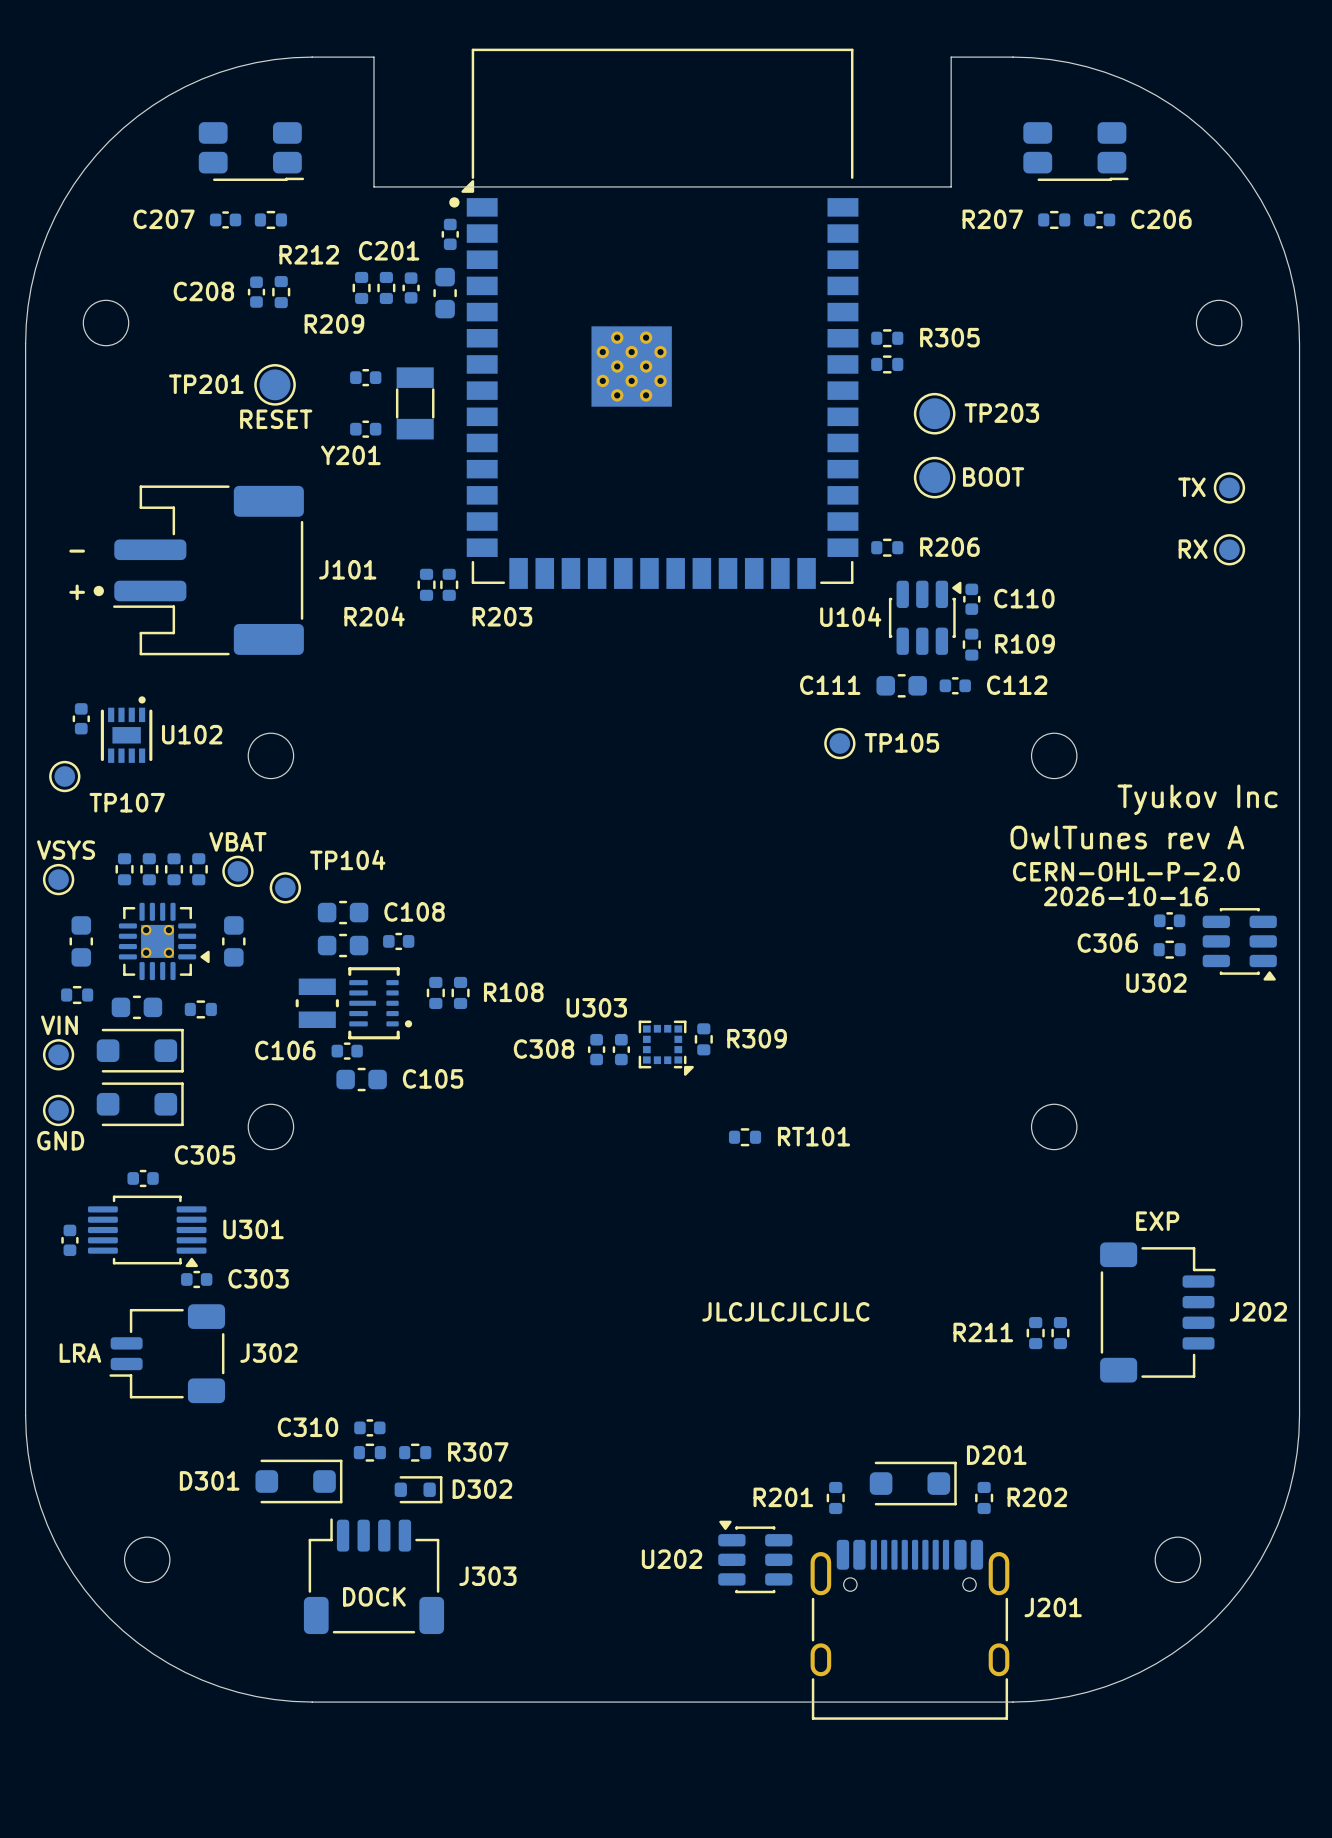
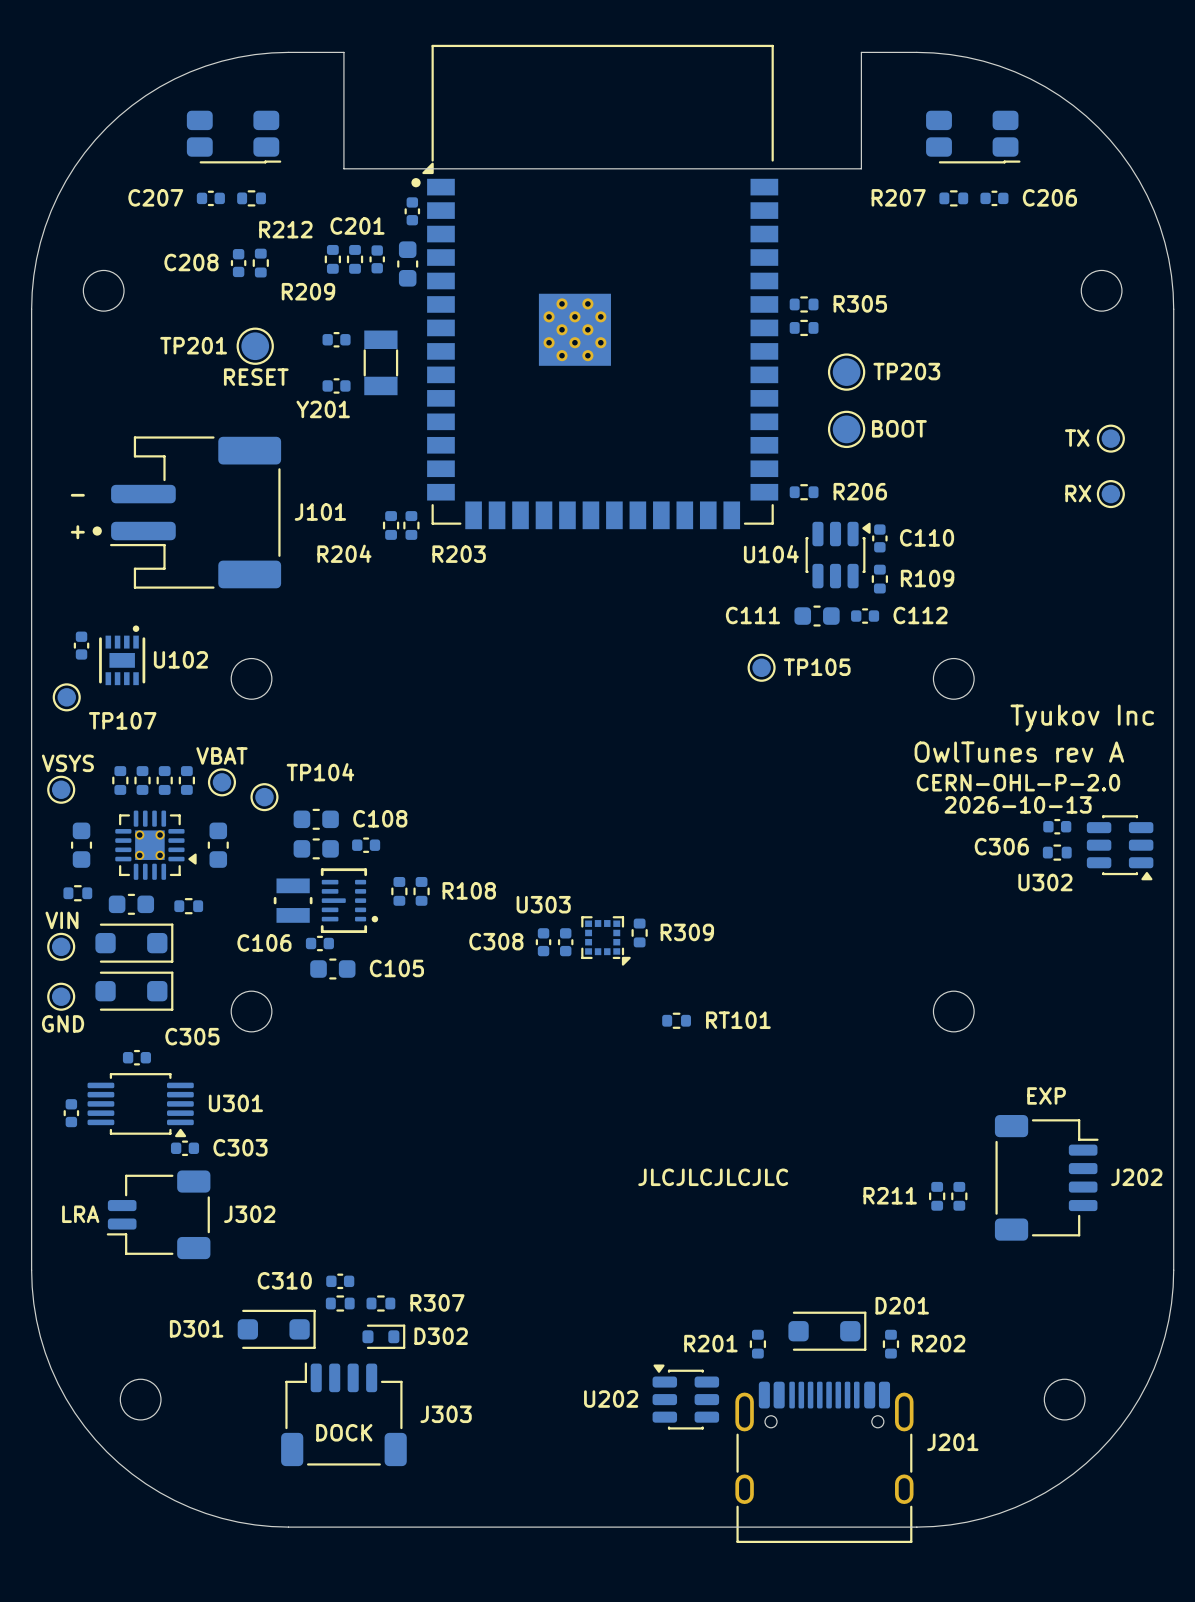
text: 2026-10-16 (1125, 896) -> 2026-10-13 (1018, 804)

